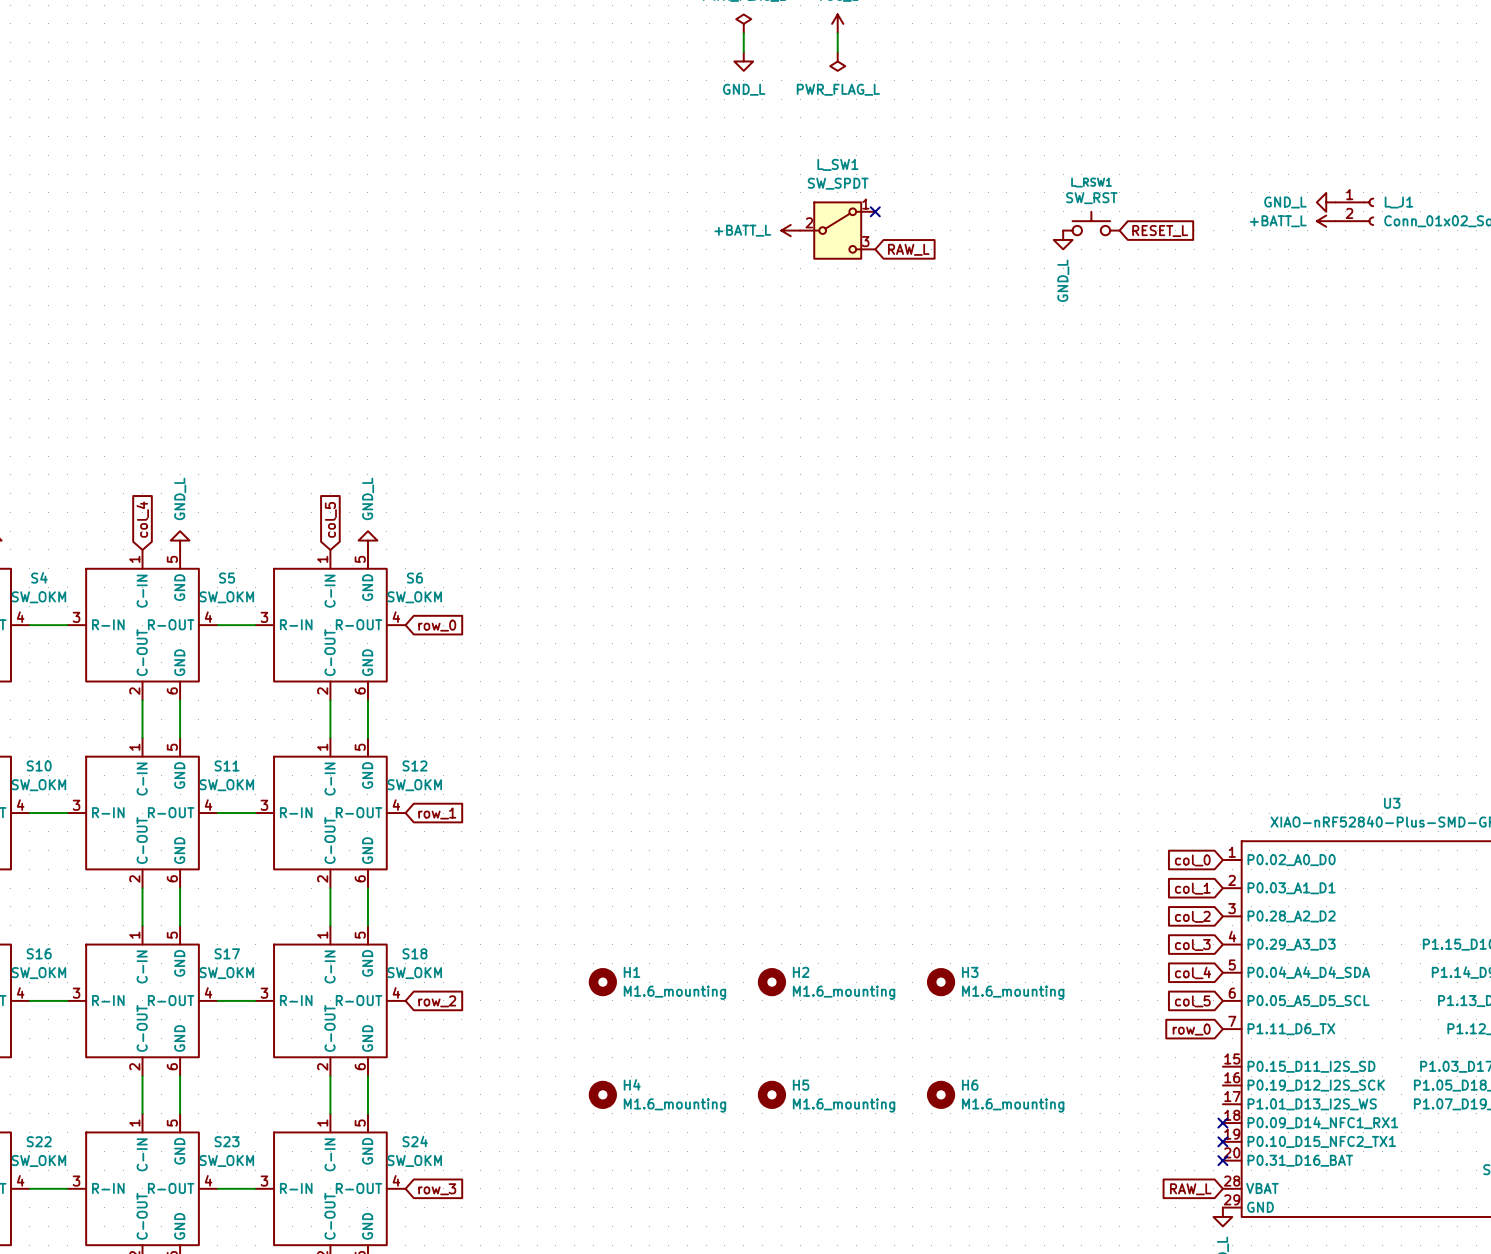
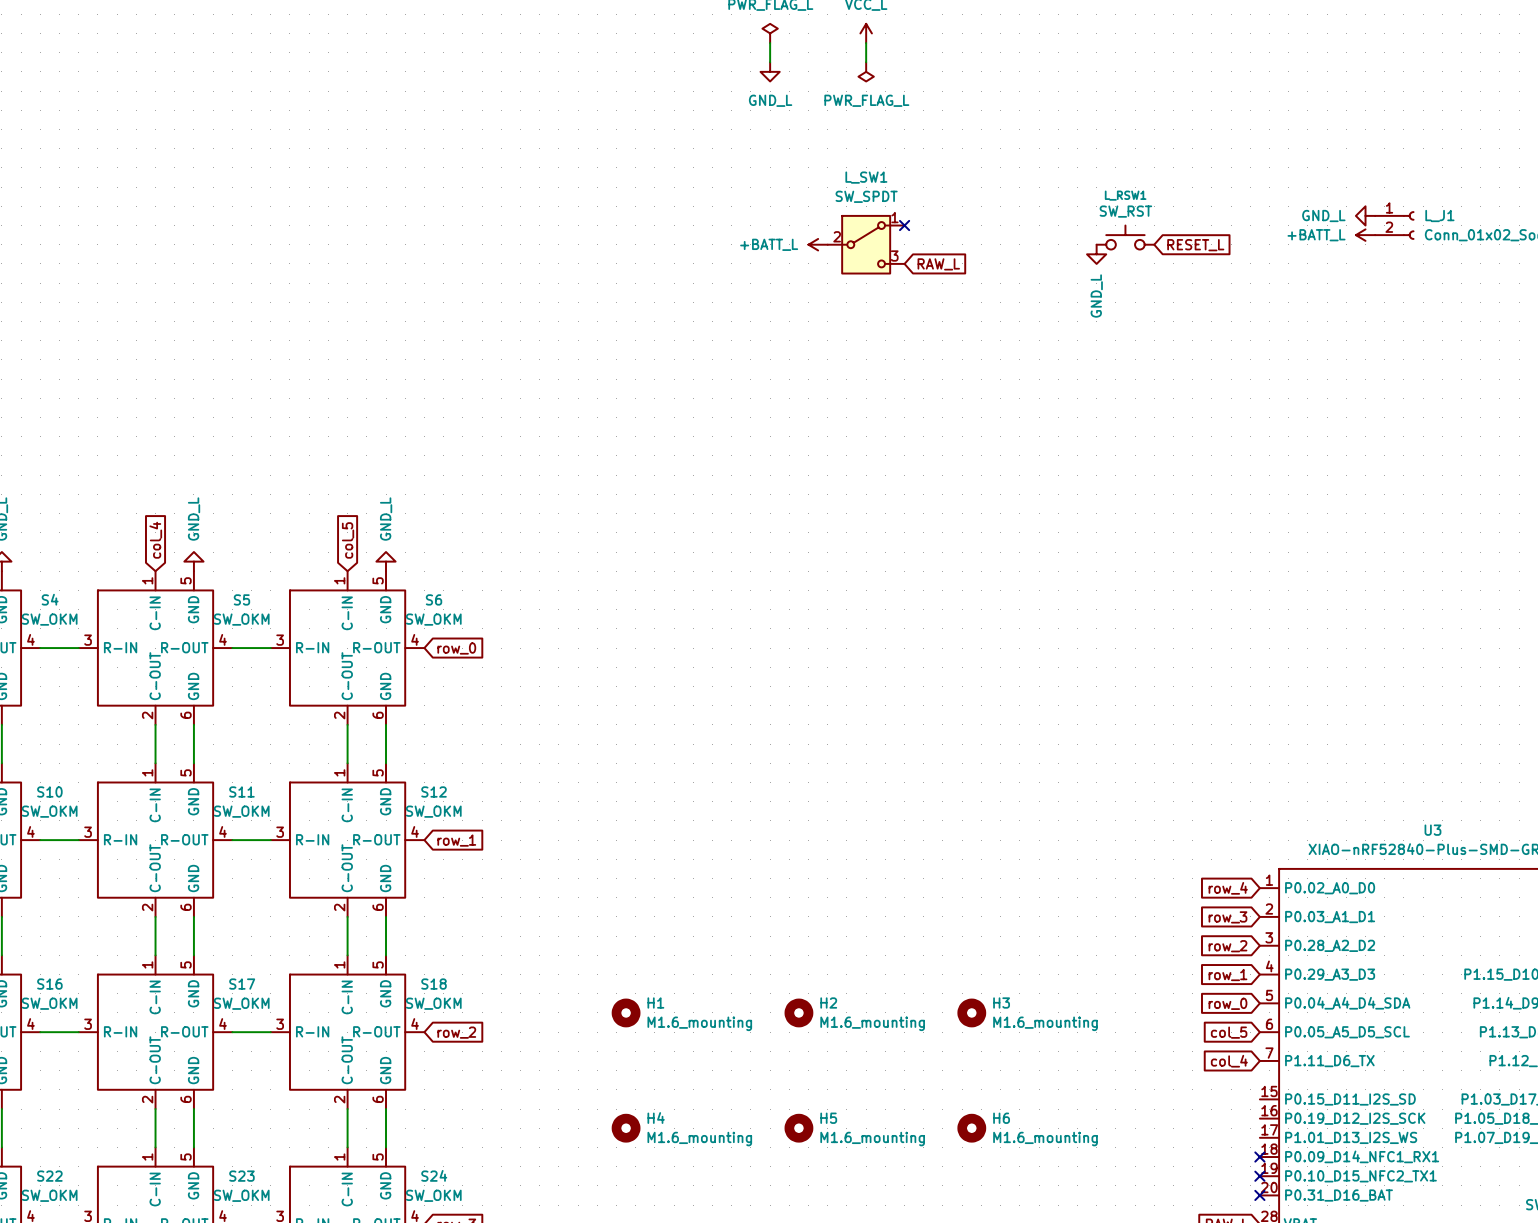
global label: col_0 (1192, 860) -> row_4 (1228, 888)
global label: col_1 (1192, 888) -> row_3 (1227, 917)
global label: col_2 (1192, 916) -> row_2 (1227, 946)
global label: col_3 (1192, 945) -> row_1 (1227, 975)
global label: col_4 (1193, 972) -> row_0 (1227, 1003)
global label: row_0 (1191, 1029) -> col_4 (1229, 1061)

